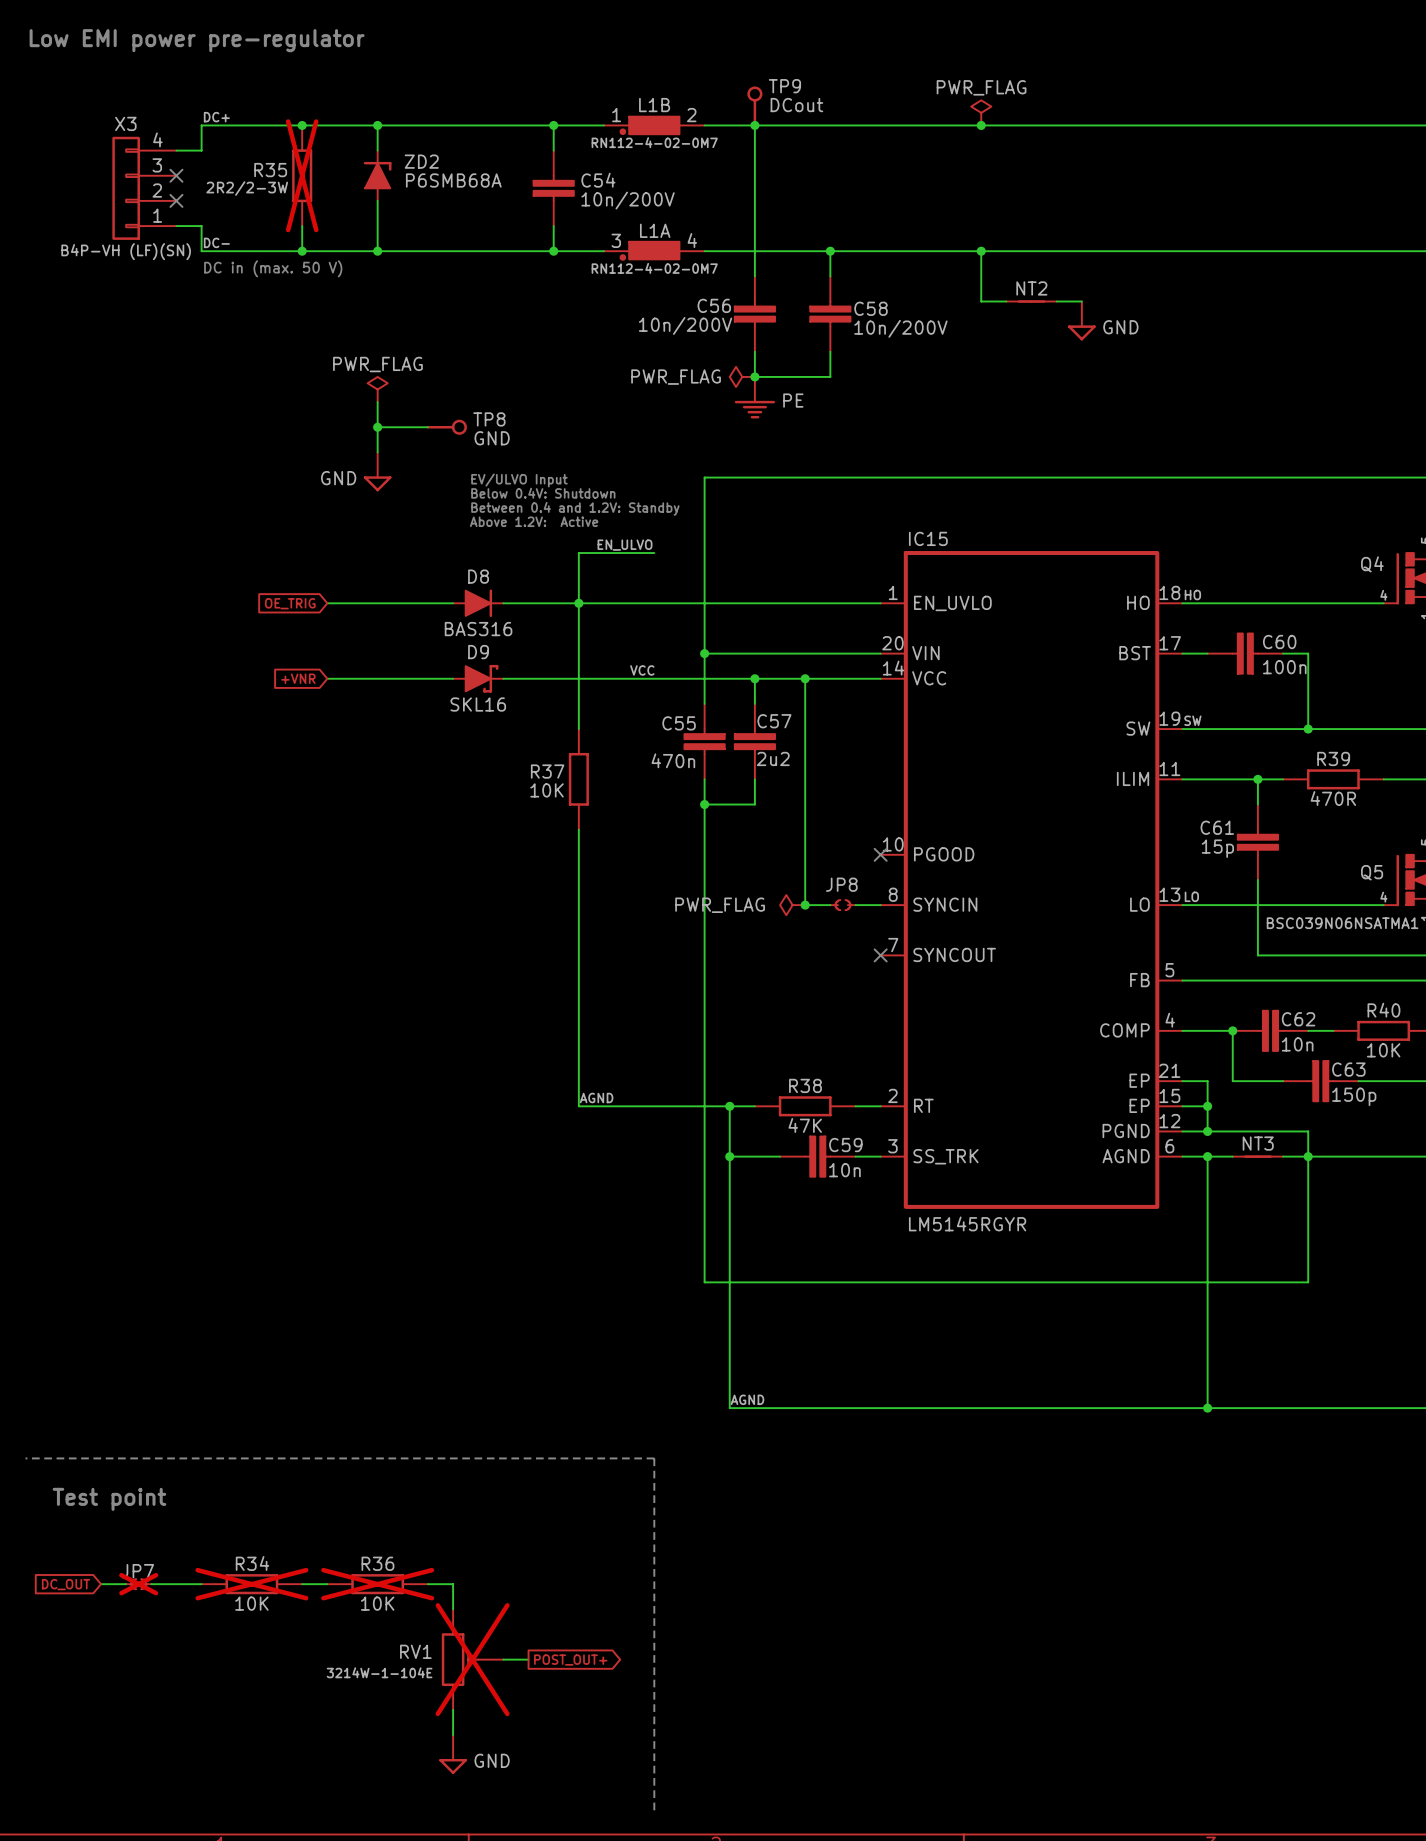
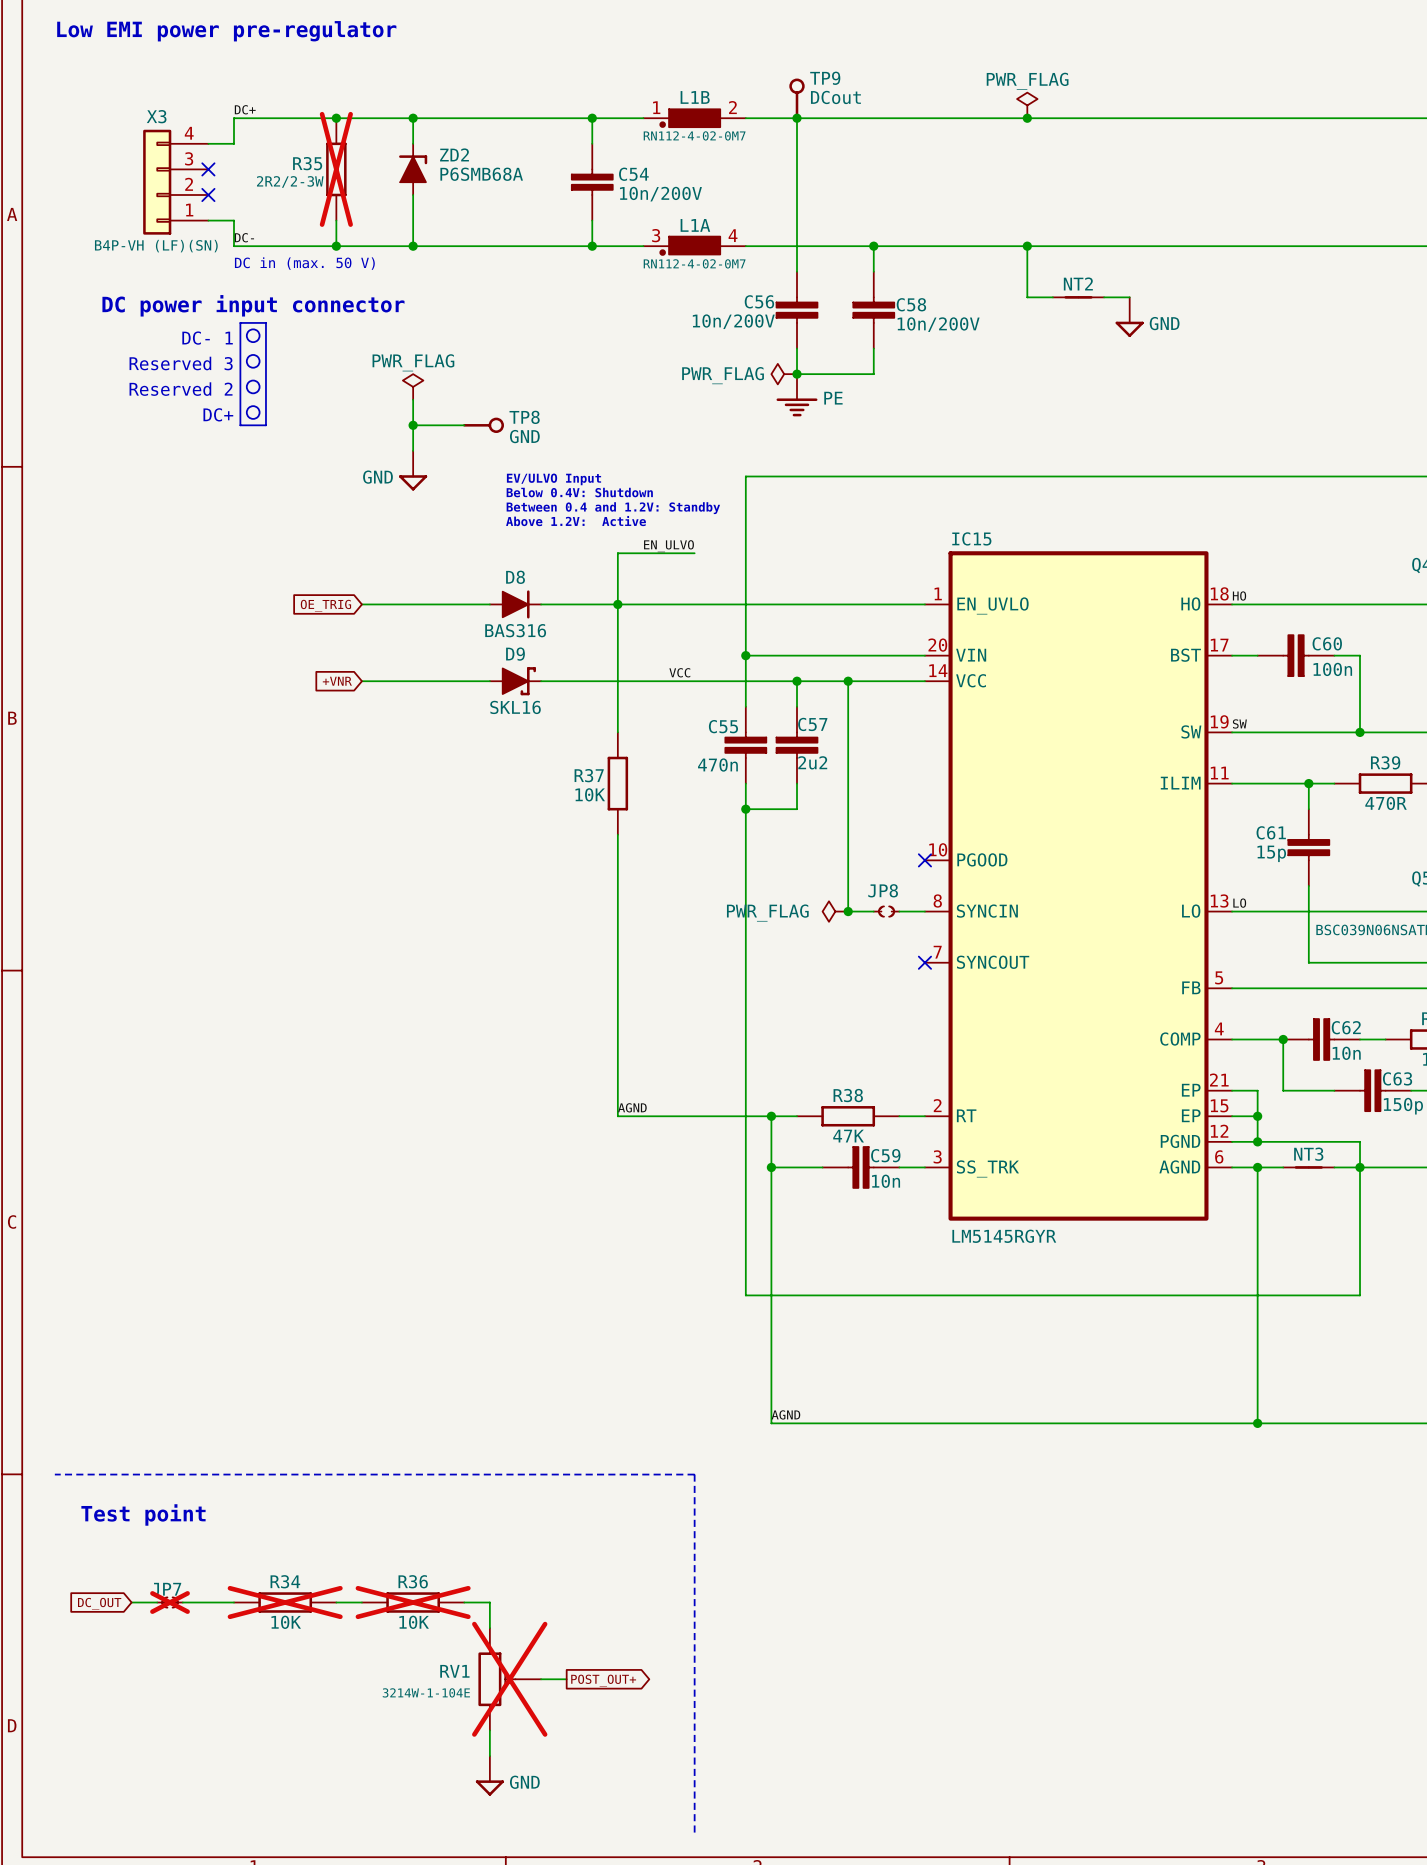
text: none -> DC power input connector (253, 305)
line: none -> (240, 322) (265, 322) (265, 425) (240, 425) (240, 322)
drawing: none -> [246, 328, 261, 420]
text: none -> DC- 1 (207, 338)
text: none -> Reserved 3 (181, 363)
text: none -> Reserved 2 (181, 389)
text: none -> DC+ (218, 414)

